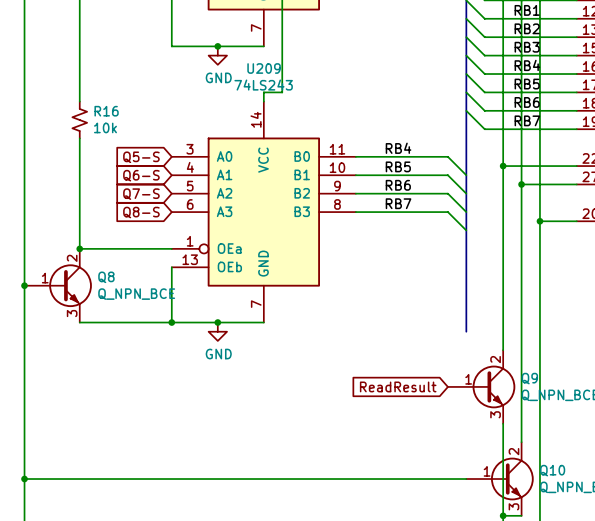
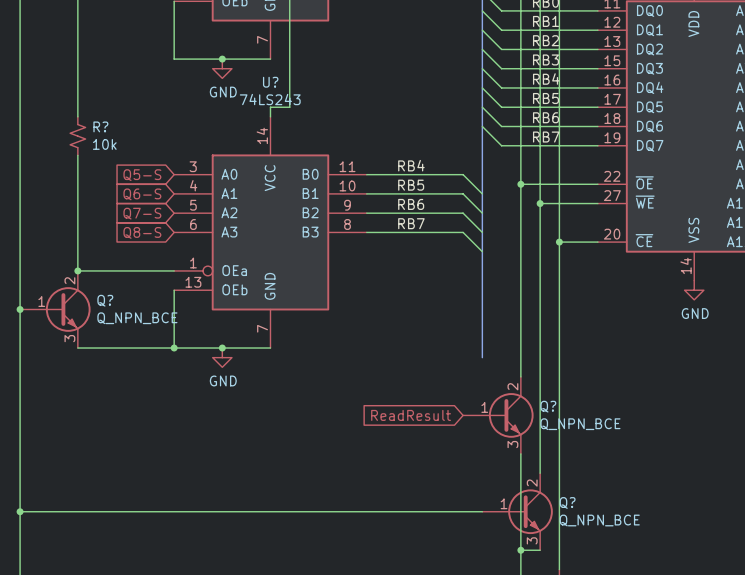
U209 name: U209 (264, 68) -> U? (270, 82)
R16 name: R16 (106, 111) -> R? (100, 126)
Q8 name: Q8 (106, 277) -> Q? (105, 300)
Q9 name: Q9 (529, 378) -> Q? (548, 406)
Q10 name: Q10 (552, 470) -> Q? (567, 502)

